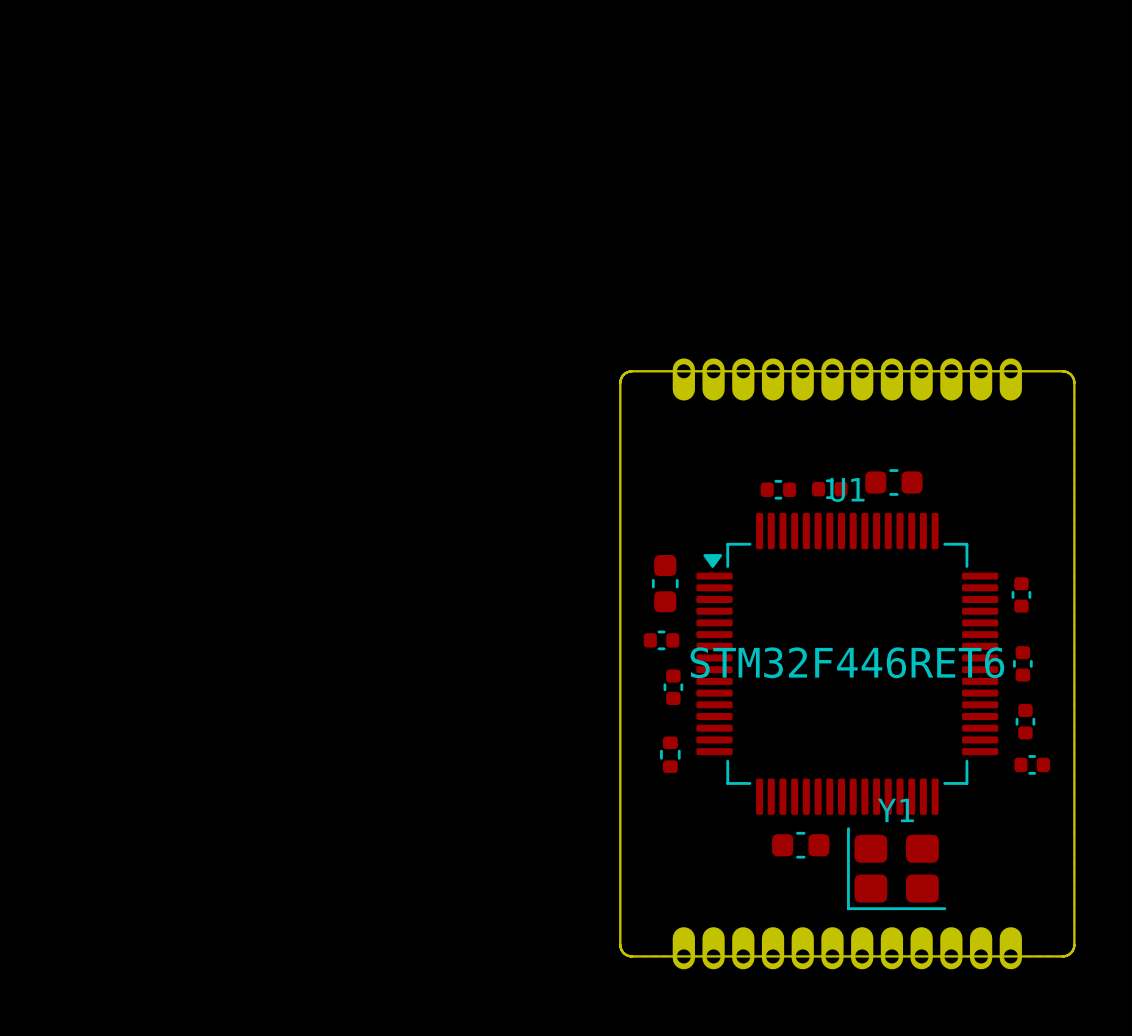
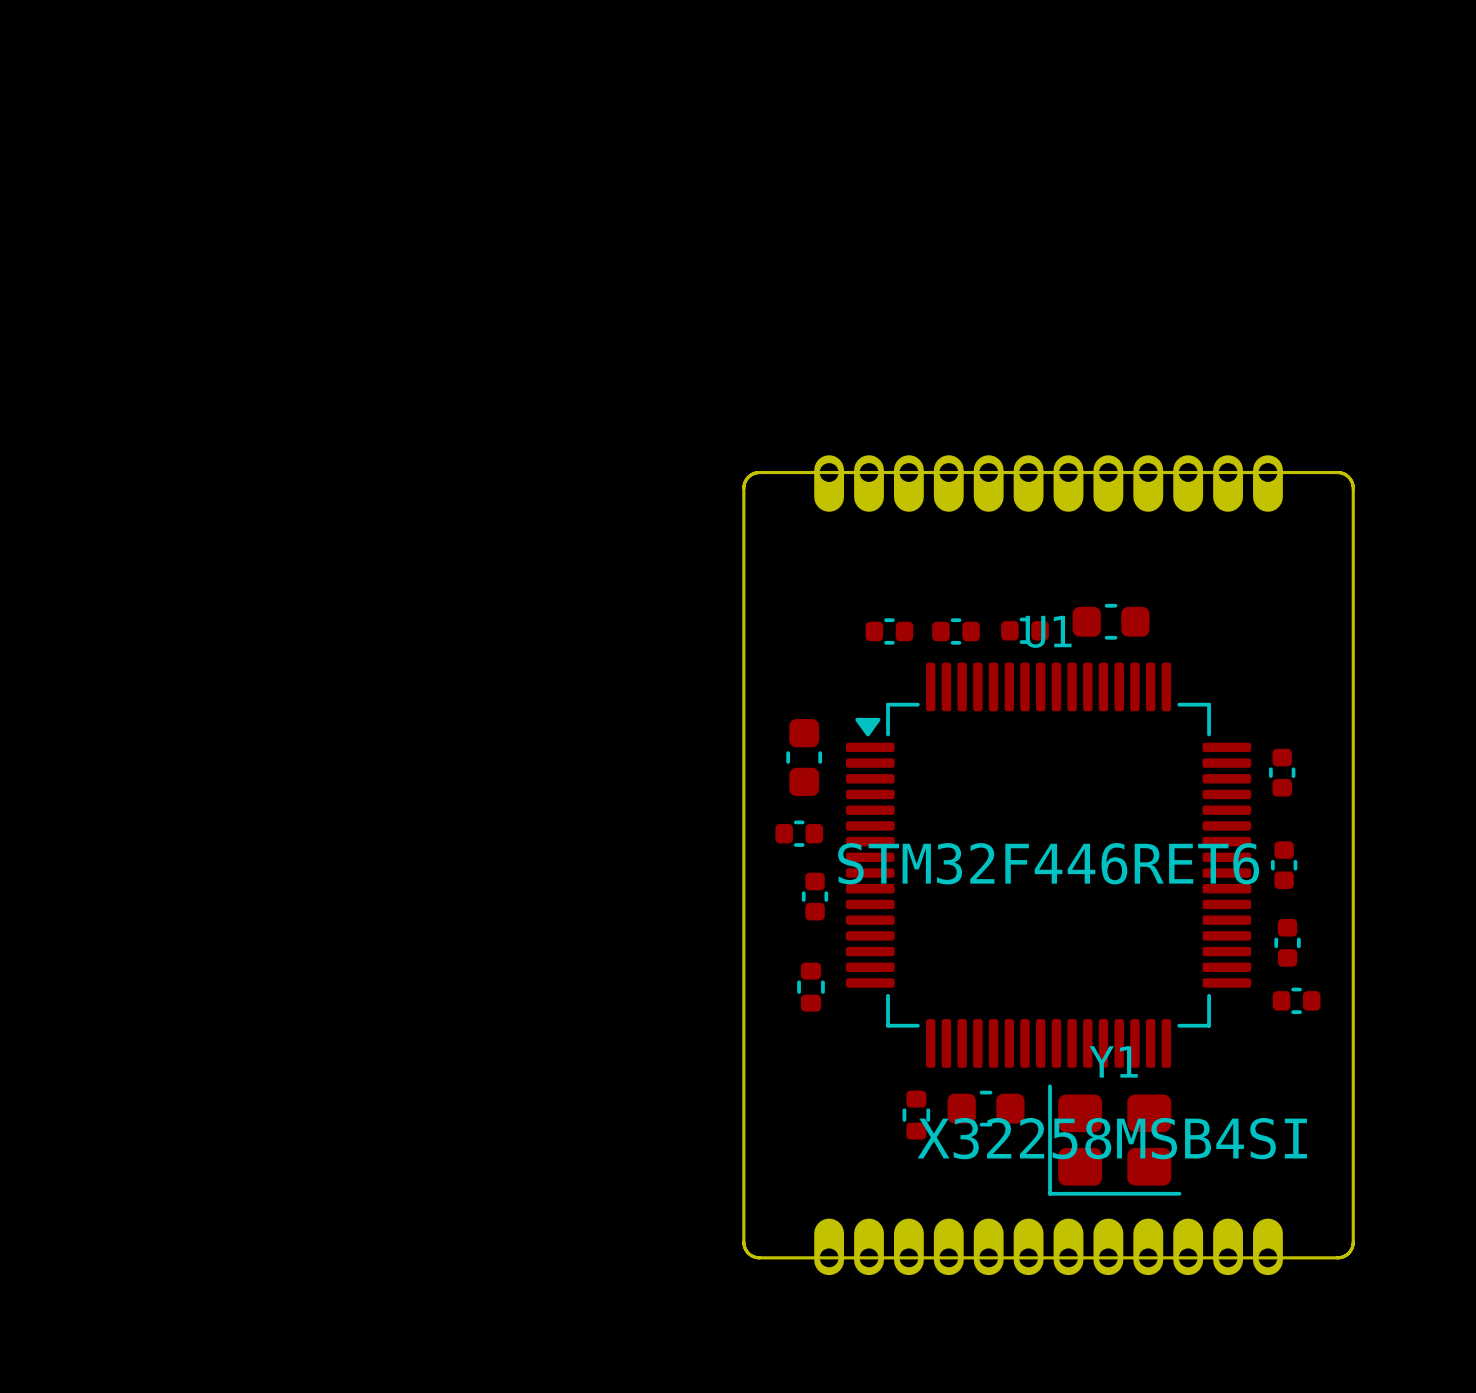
part: none -> (889, 631)
part: none -> (916, 1115)
Y1 text: none -> X32258MSB4SI (1112, 1138)

